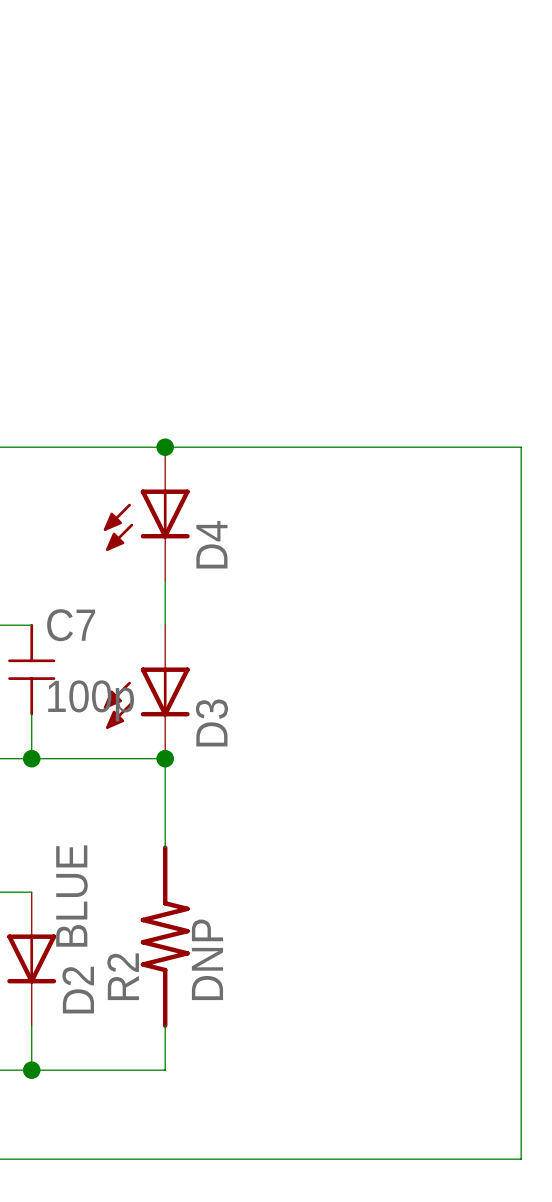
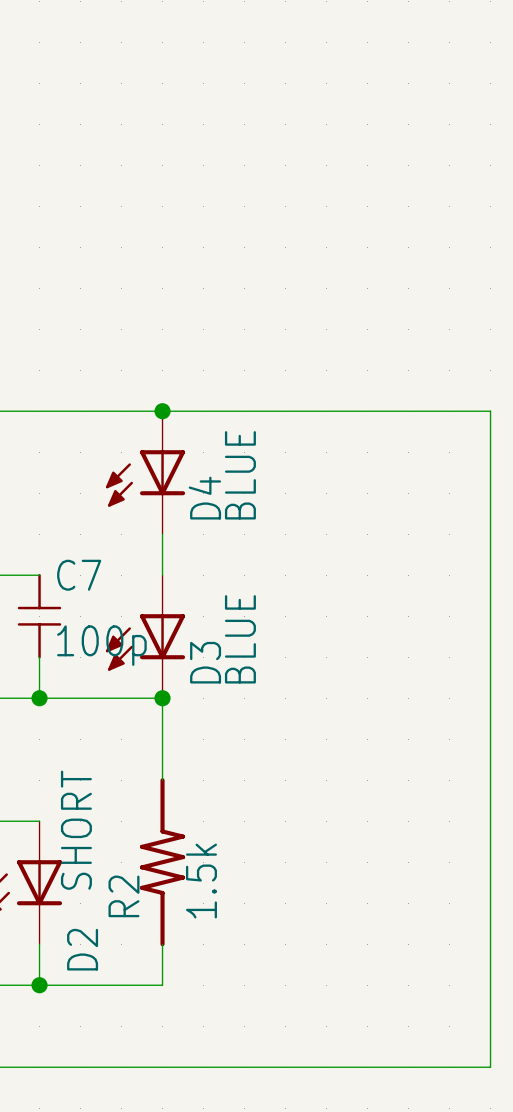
D4 value: none -> BLUE (240, 475)
D3 value: none -> BLUE (240, 639)
D2 value: BLUE (71, 896) -> SHORT (76, 830)
R2 value: DNP (207, 959) -> 1.5k (201, 881)
D2 name position: D2 (78, 990) -> D2 (82, 949)

